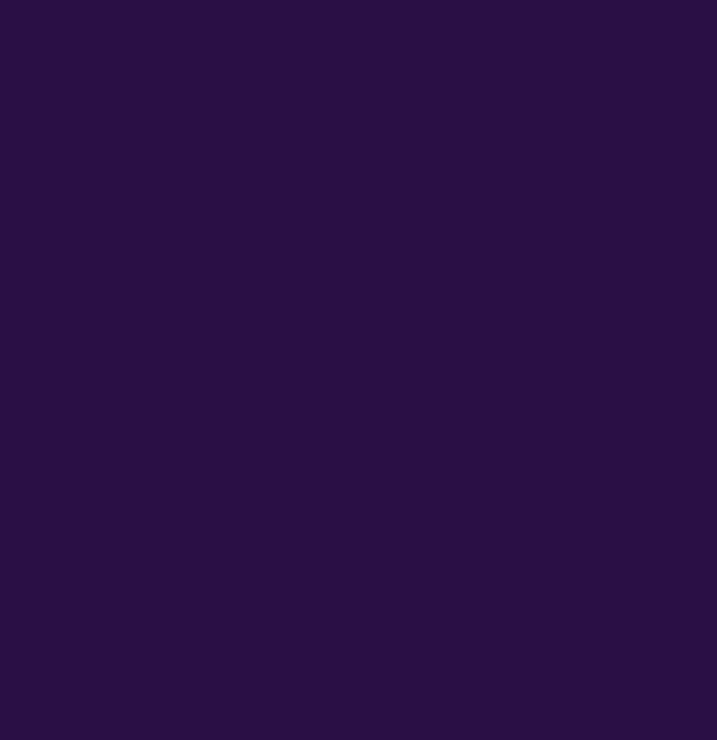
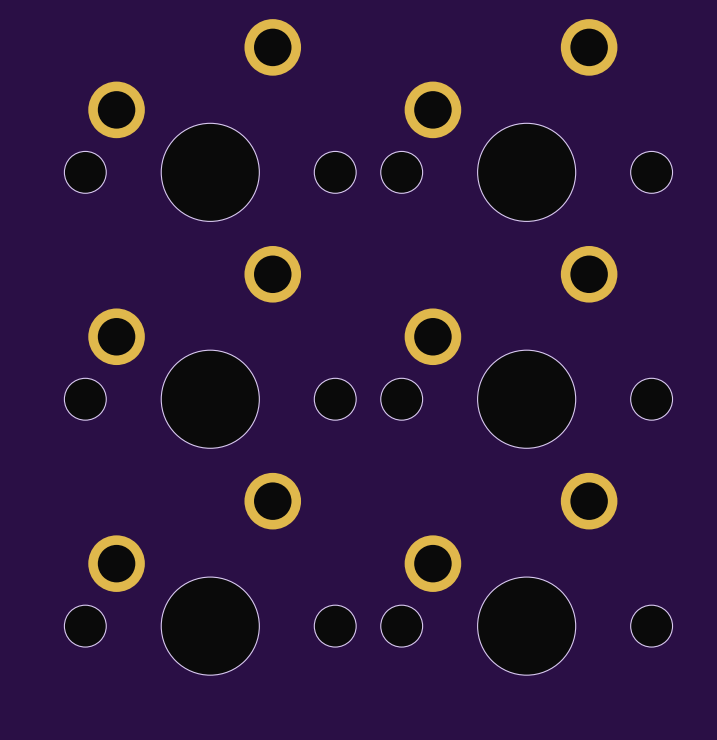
part: none -> (210, 120)
part: none -> (526, 120)
part: none -> (210, 347)
part: none -> (526, 347)
part: none -> (210, 574)
part: none -> (526, 574)

